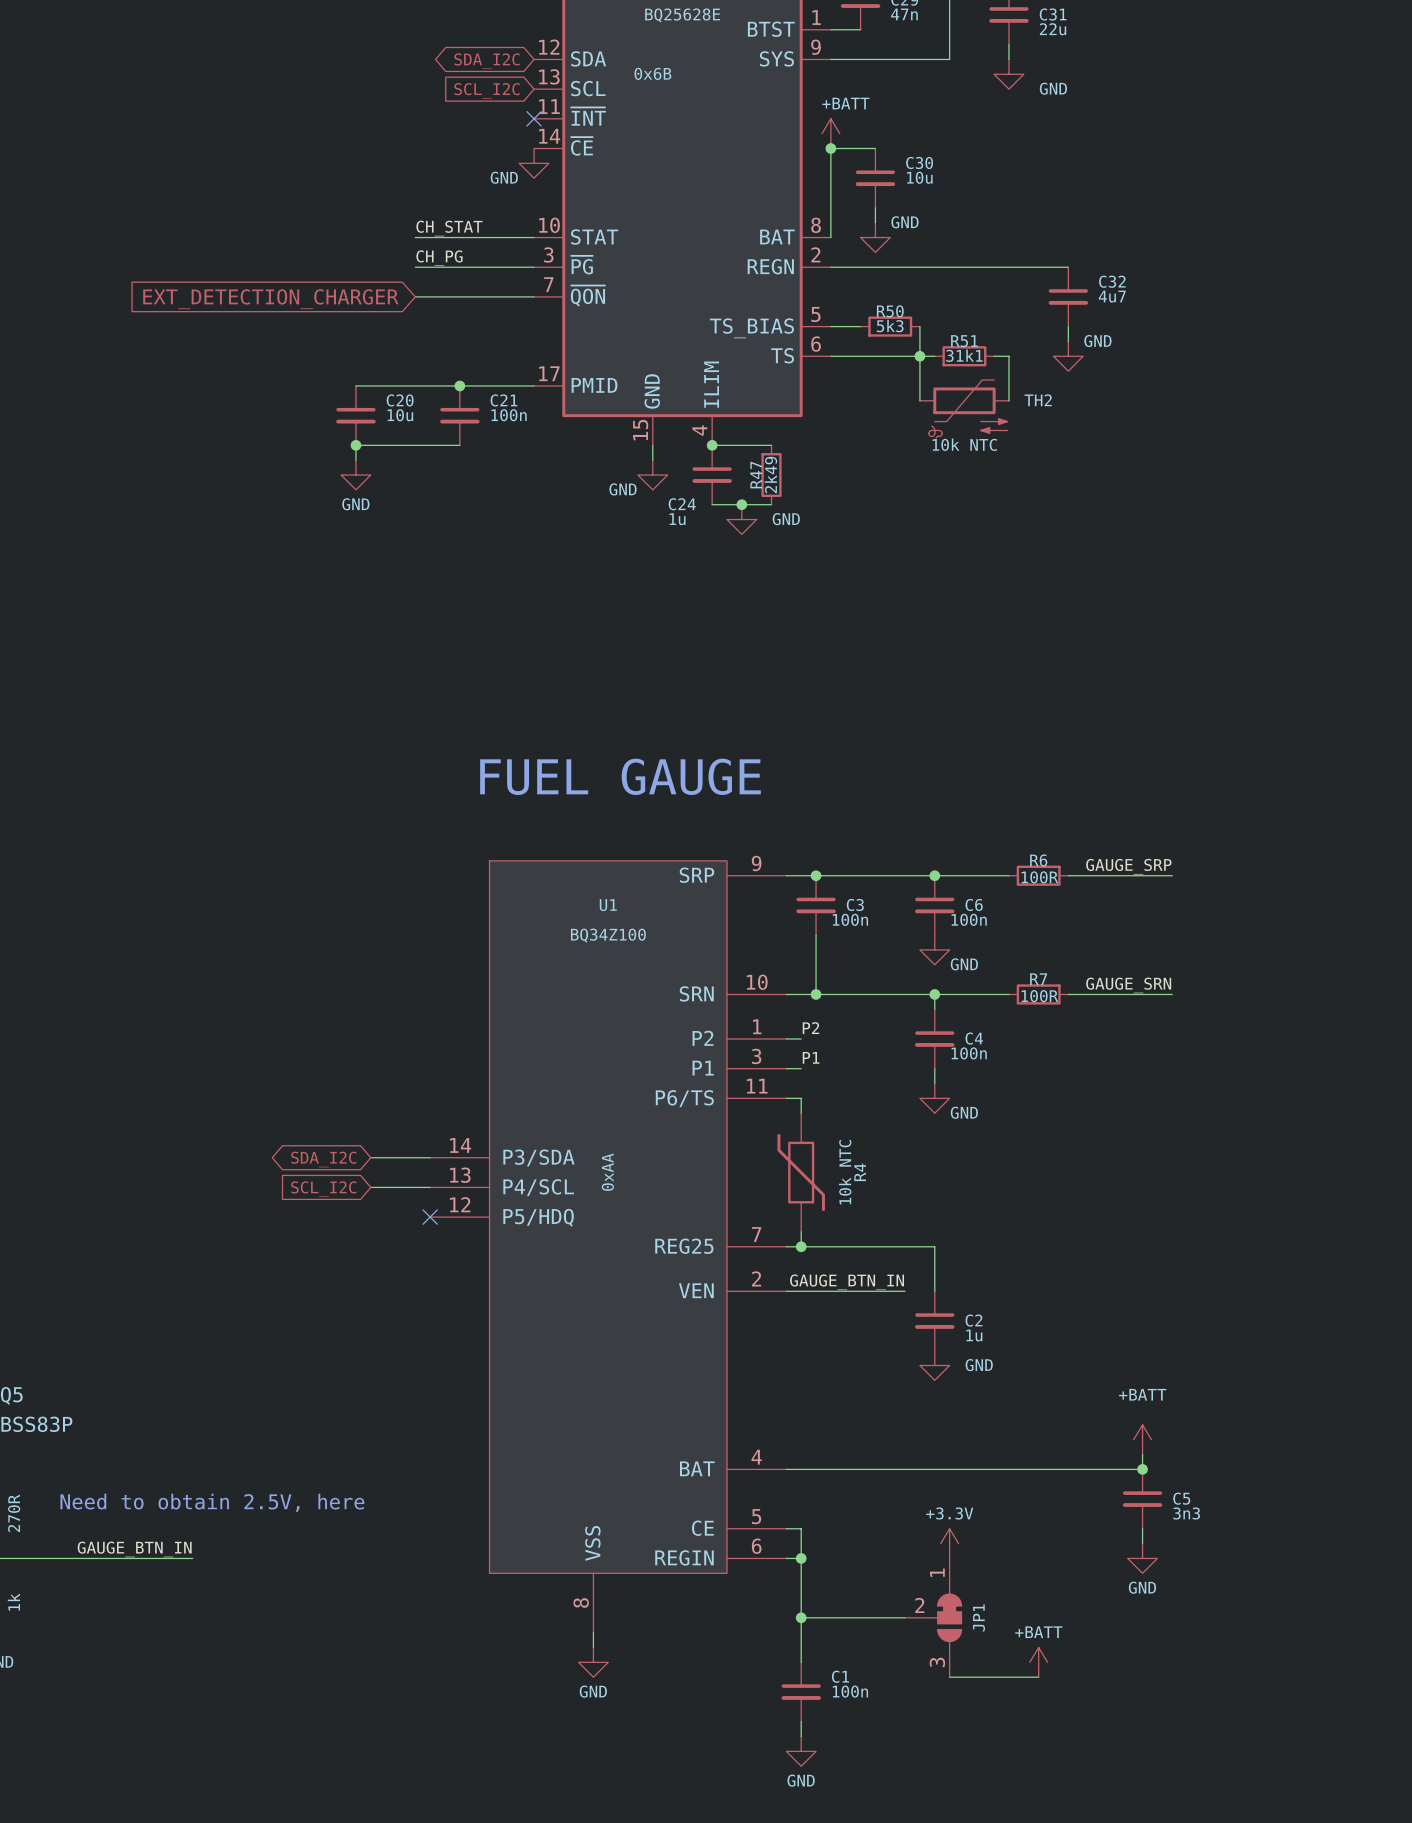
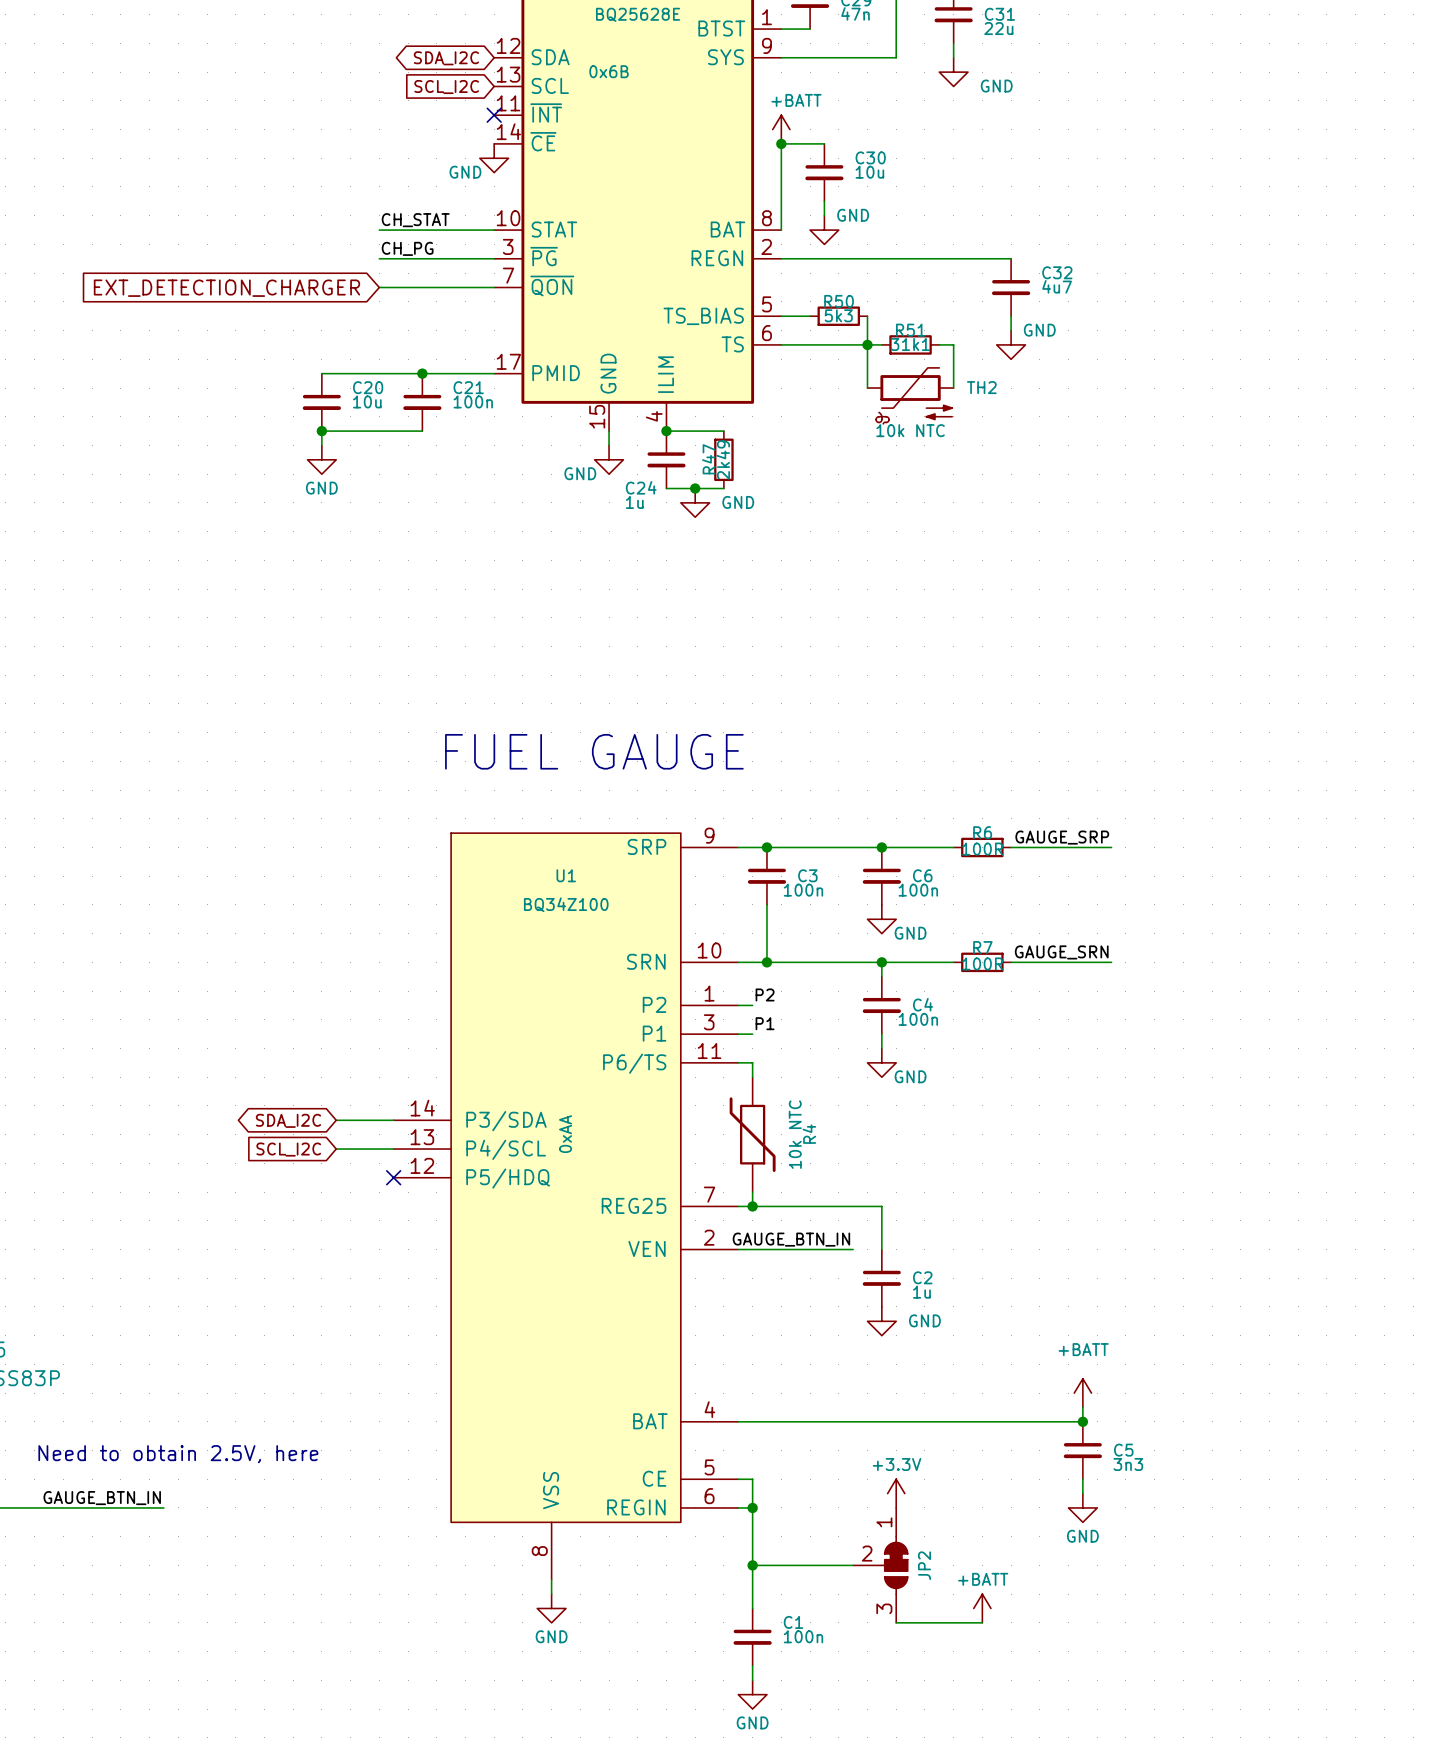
JP1 name: JP1 (978, 1617) -> JP2 (924, 1565)

